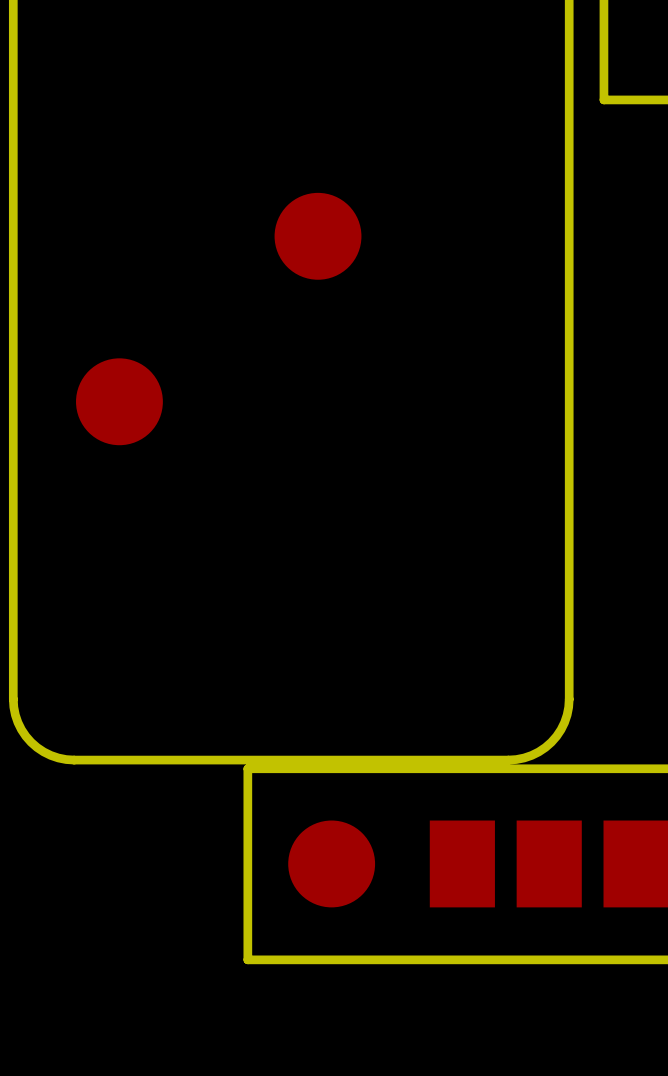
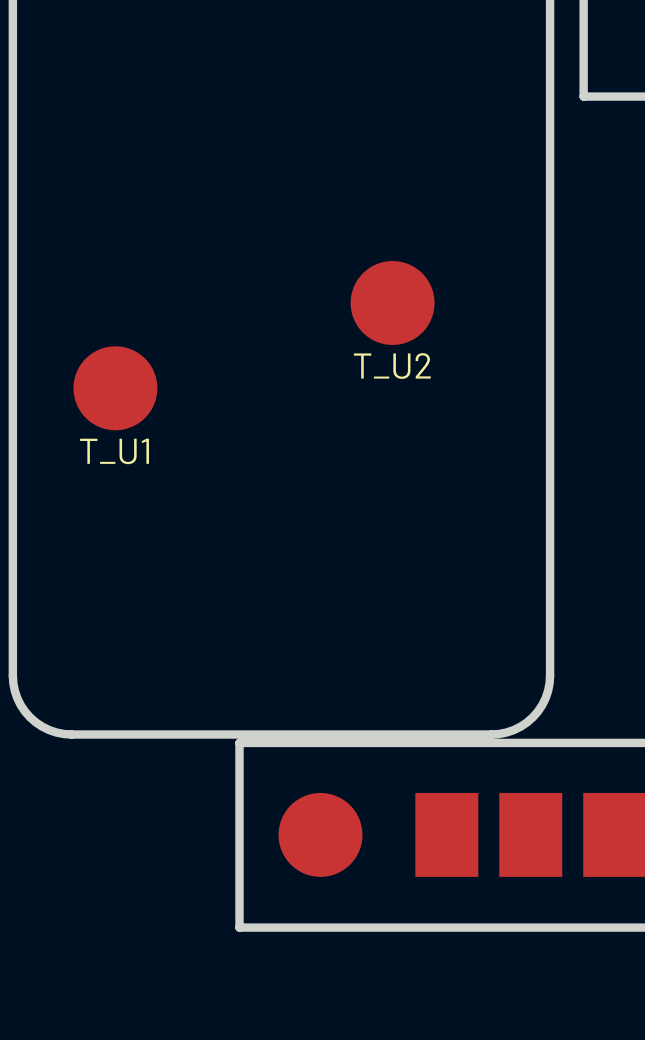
part: (318, 236) -> none
T_U2: none -> (392, 302)
T_U1 name: none -> T_U1 (114, 451)

